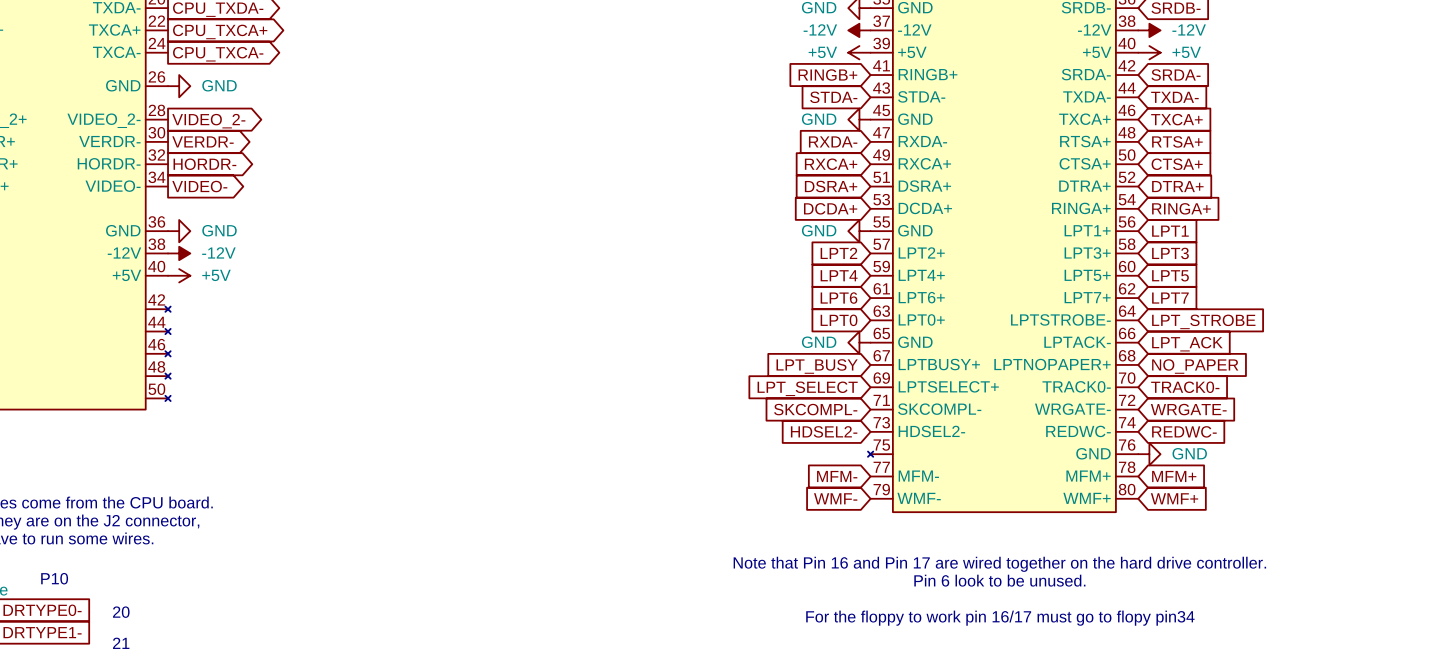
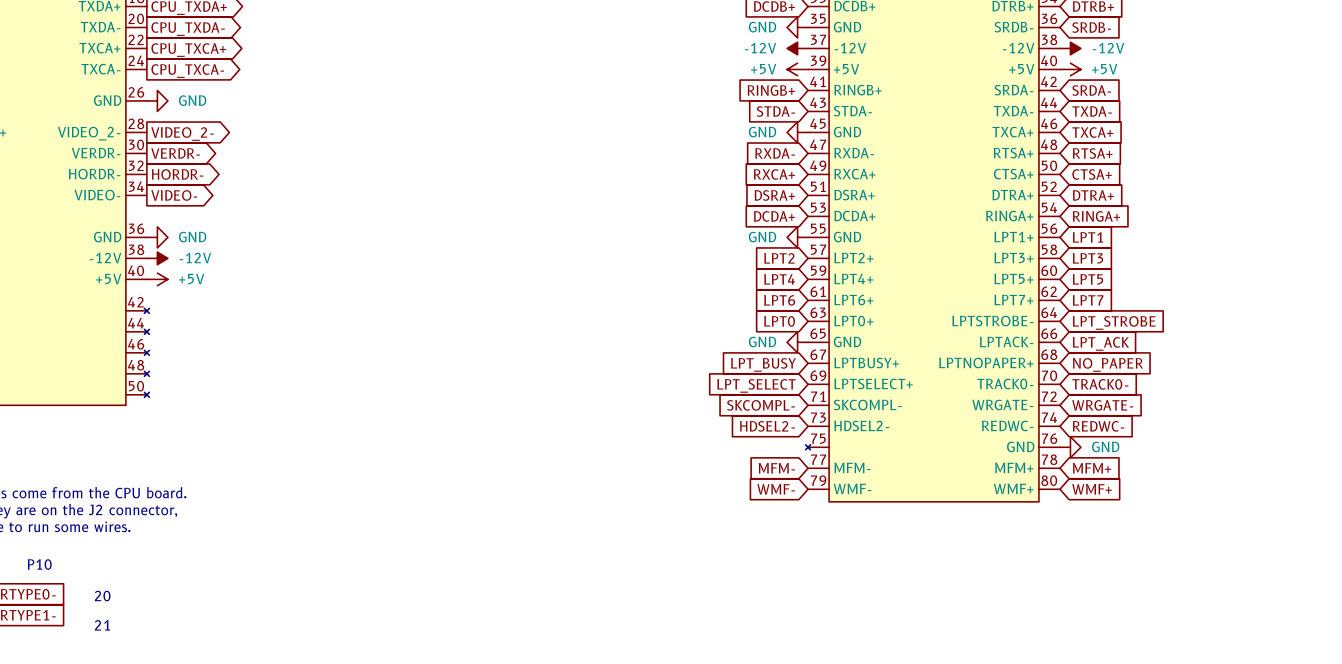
text: Note that Pin 16 and Pin 17 are wired together on the hard drive controller. (999, 564) -> none
text: Pin 6 look to be unused. (999, 580) -> none
text: For the floppy to work pin 16/17 must go to flopy pin34 (1000, 618) -> none

